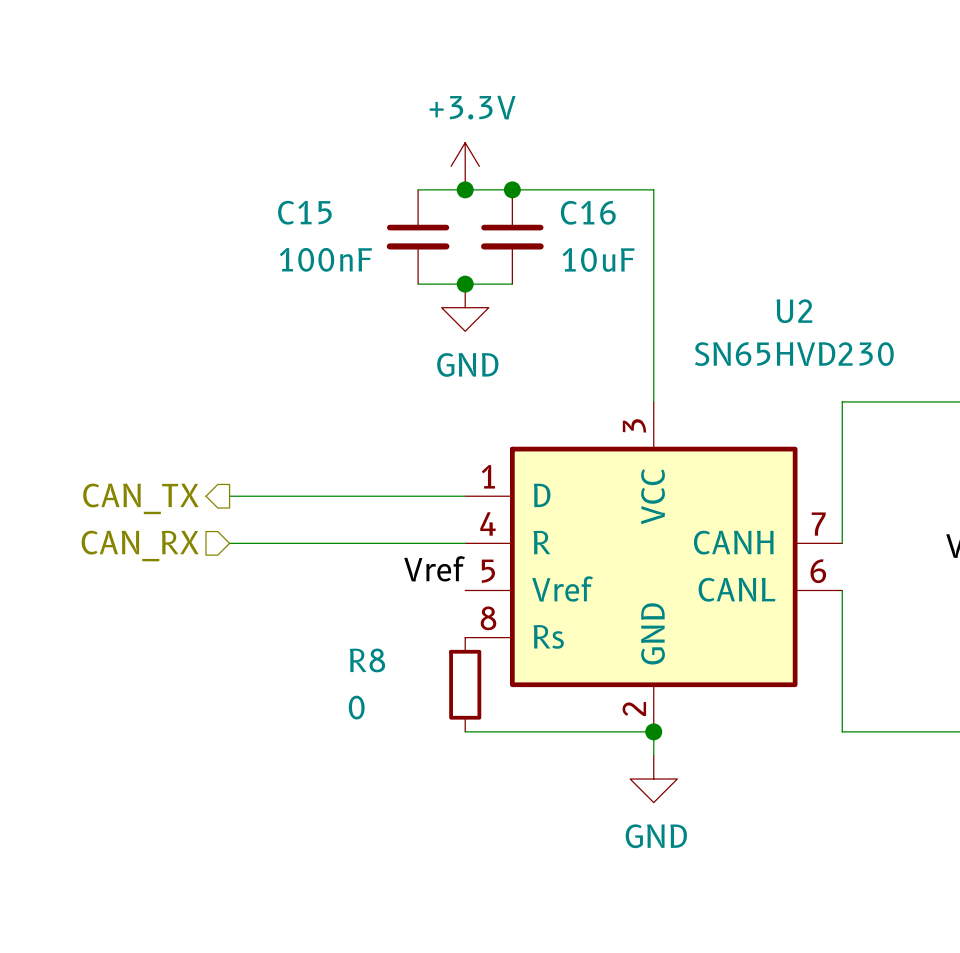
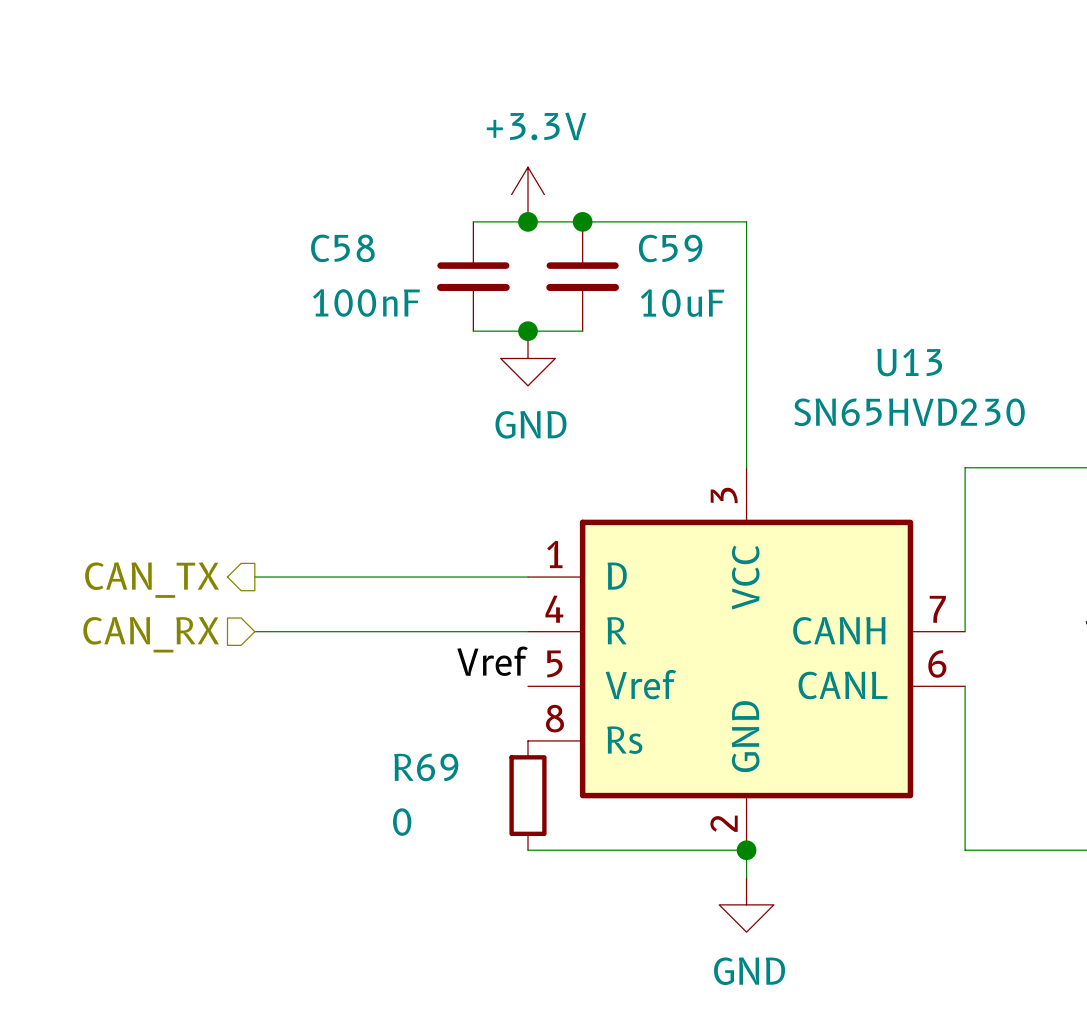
C15 name: C15 (304, 212) -> C58 (342, 248)
C16 name: C16 (588, 212) -> C59 (670, 248)
U2 name: U2 (794, 311) -> U13 (909, 362)
R8 name: R8 (367, 660) -> R69 (426, 767)

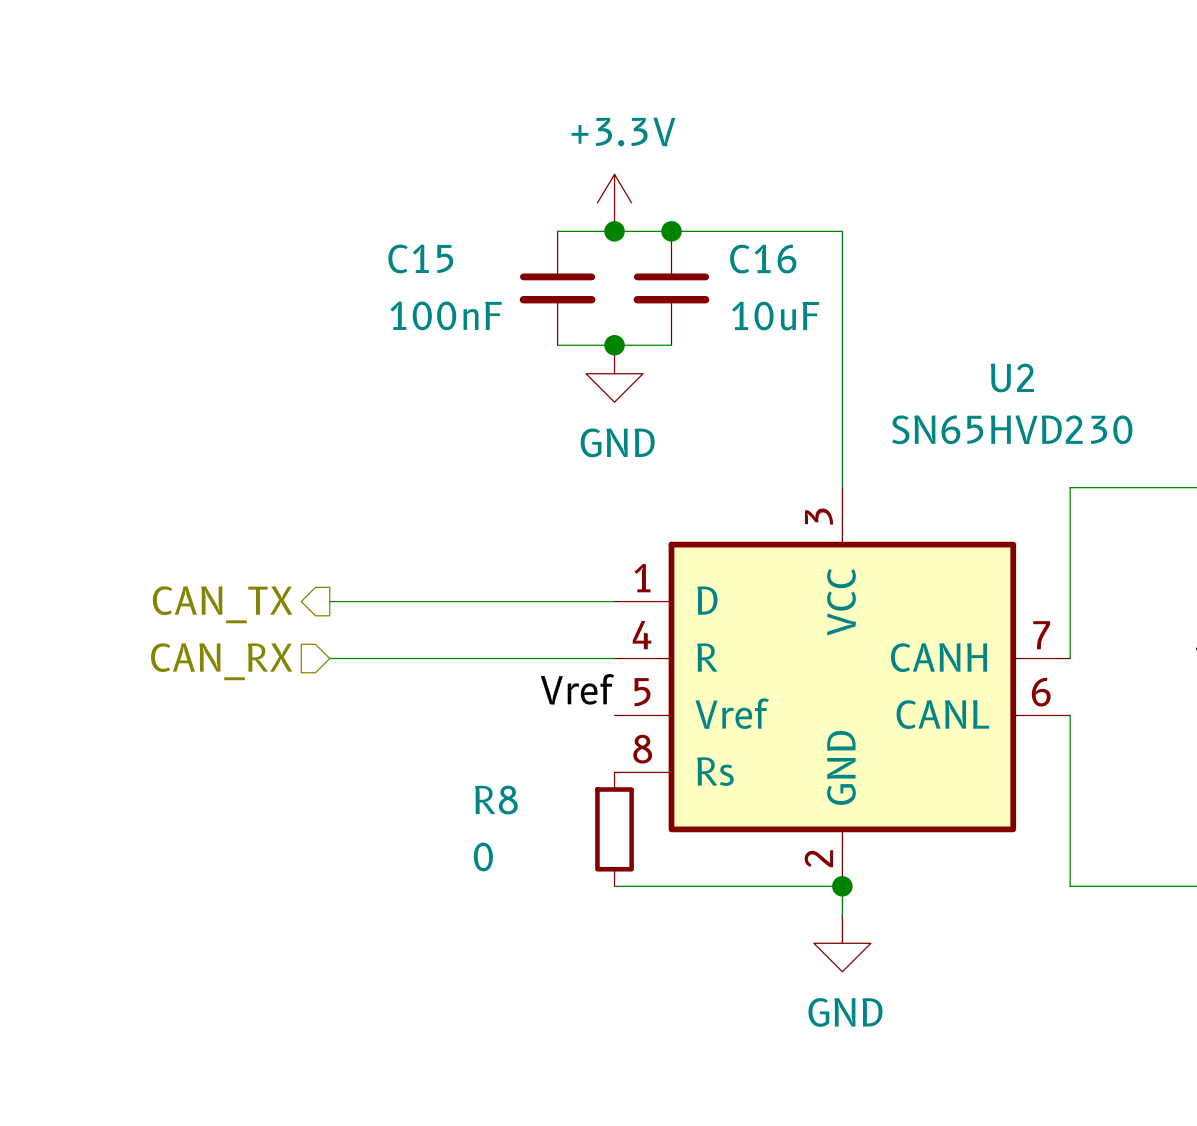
C58 name: C58 (342, 248) -> C15 (420, 258)
C59 name: C59 (670, 248) -> C16 (763, 259)
U13 name: U13 (909, 362) -> U2 (1012, 377)
R69 name: R69 (426, 767) -> R8 (496, 800)

